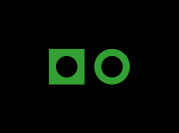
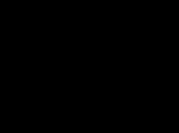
part: (89, 66) -> none

